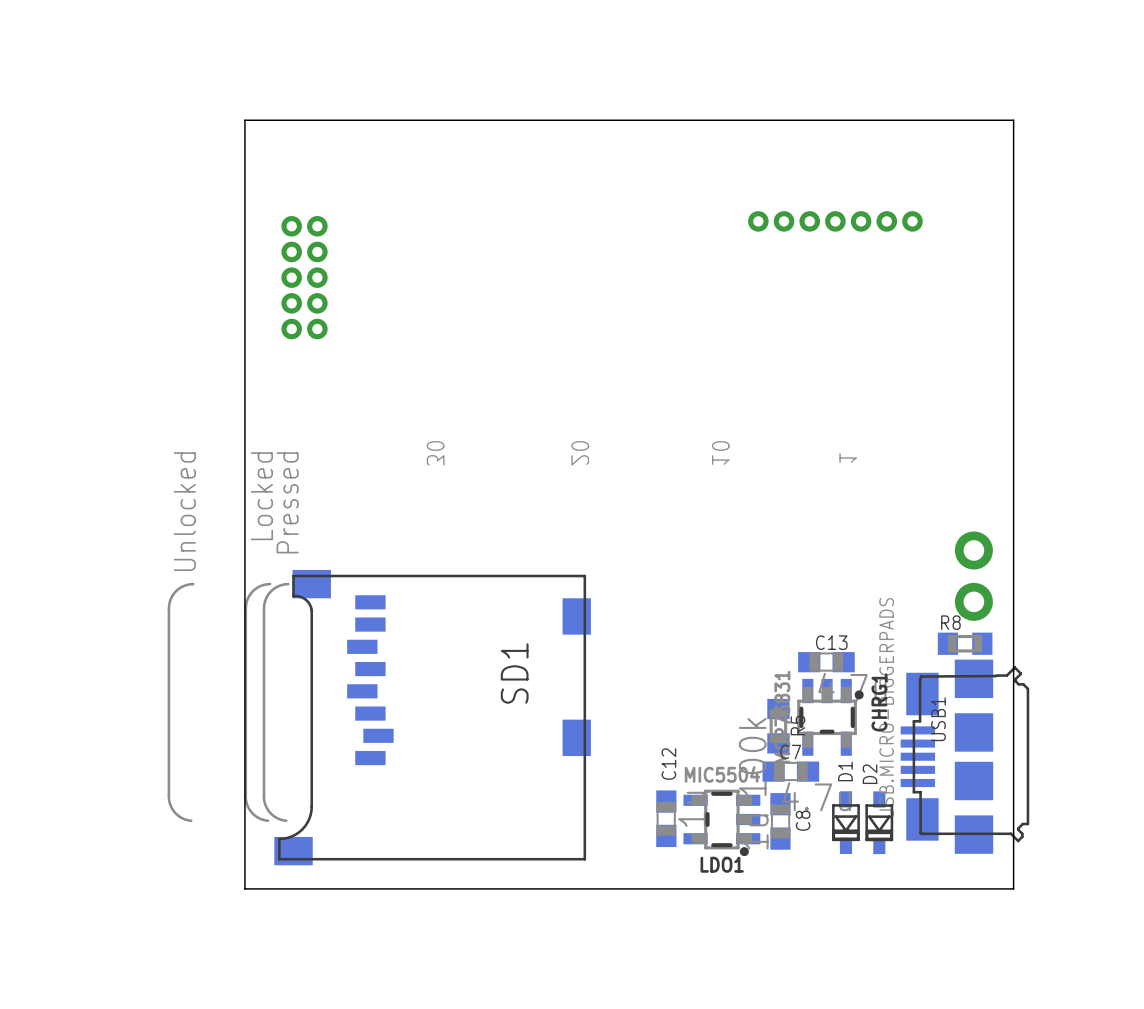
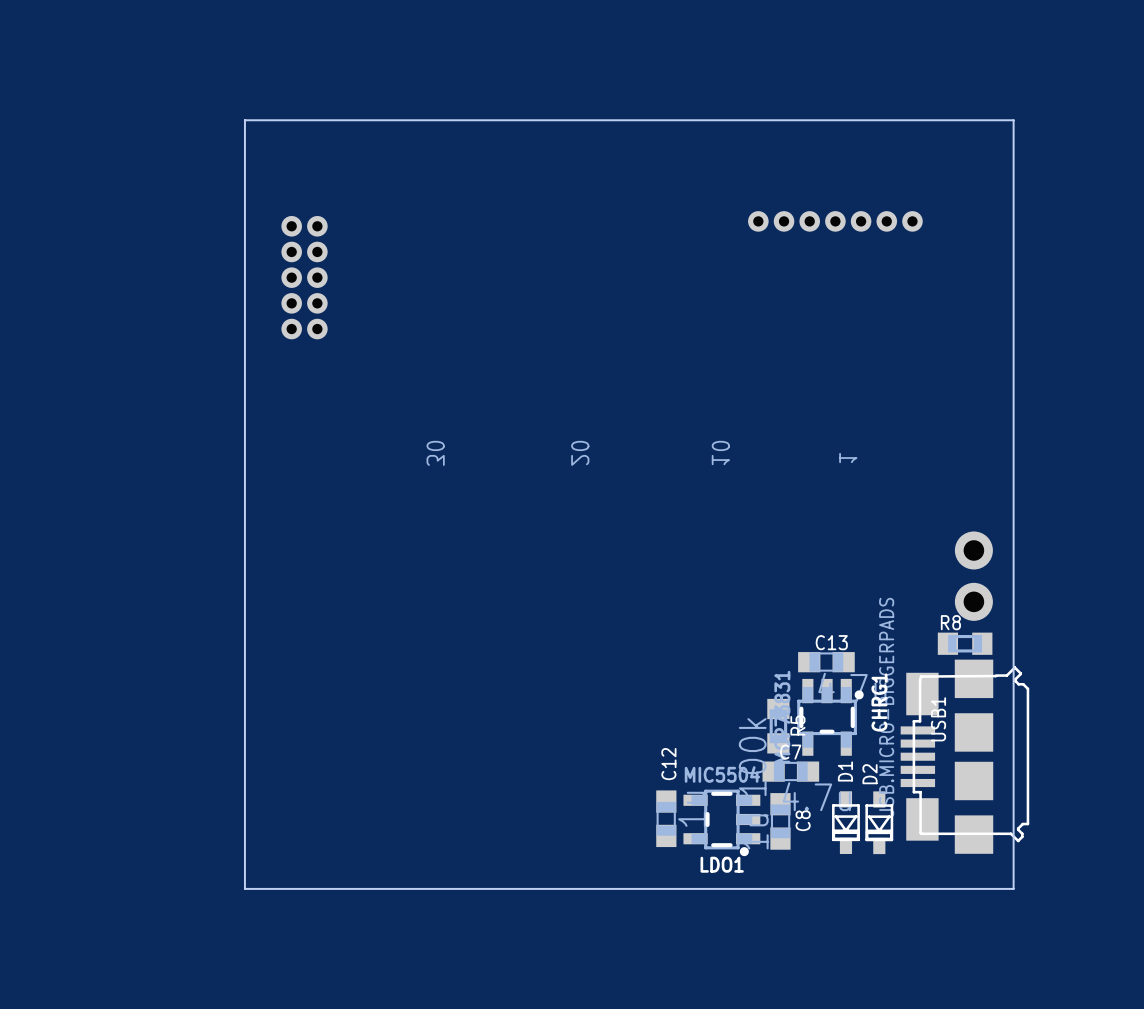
SD1: (379, 717) -> none

